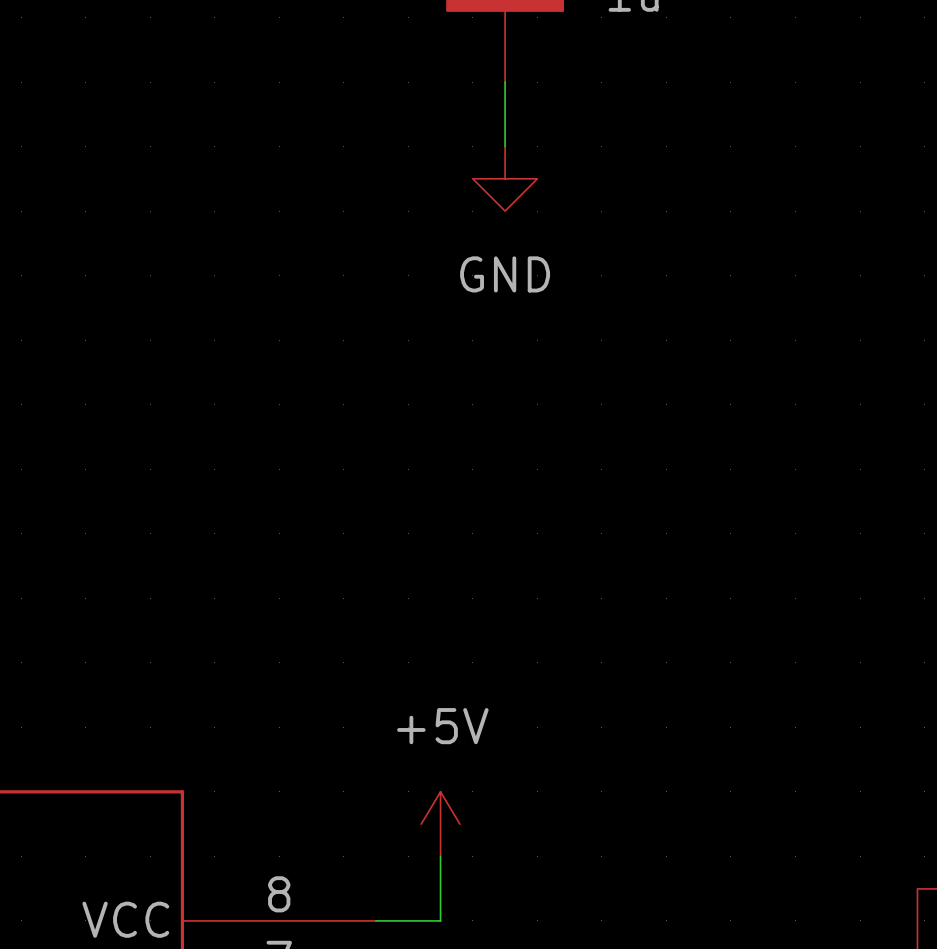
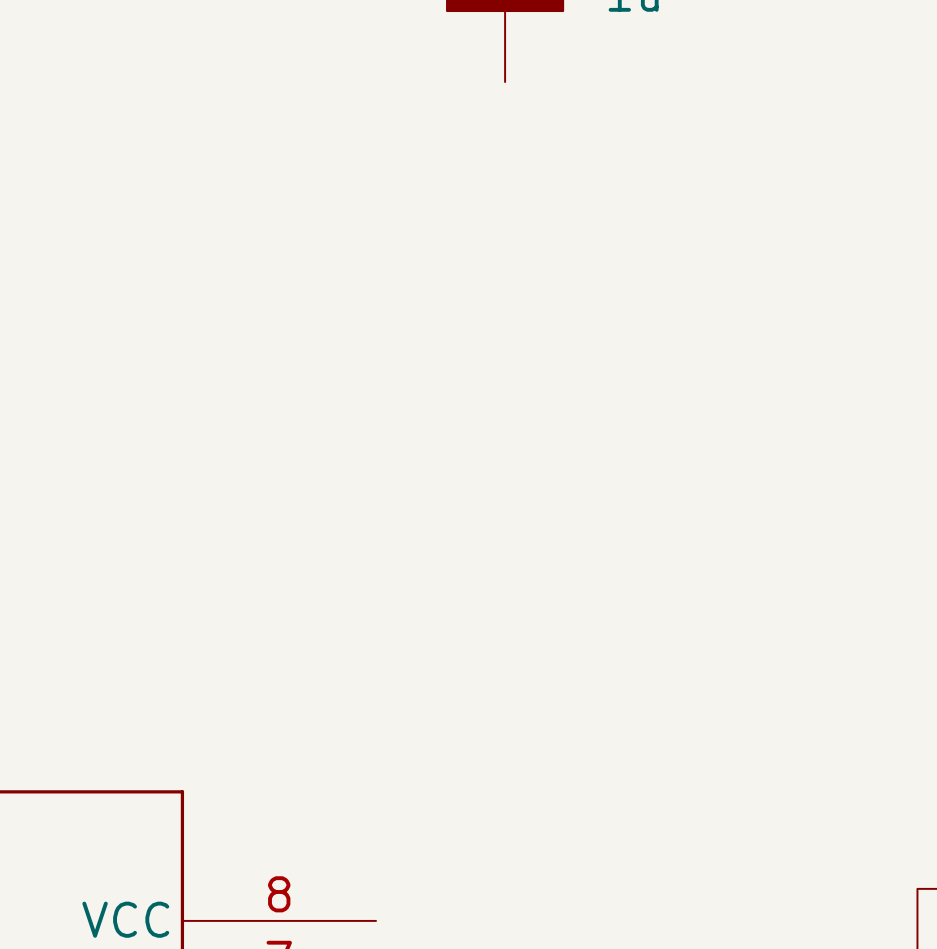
wire: (505, 82) (505, 146) -> none
power symbol: GND (505, 178) -> none
power symbol: +5V (440, 824) -> none
wire: (440, 856) (440, 920) (376, 920) -> none

